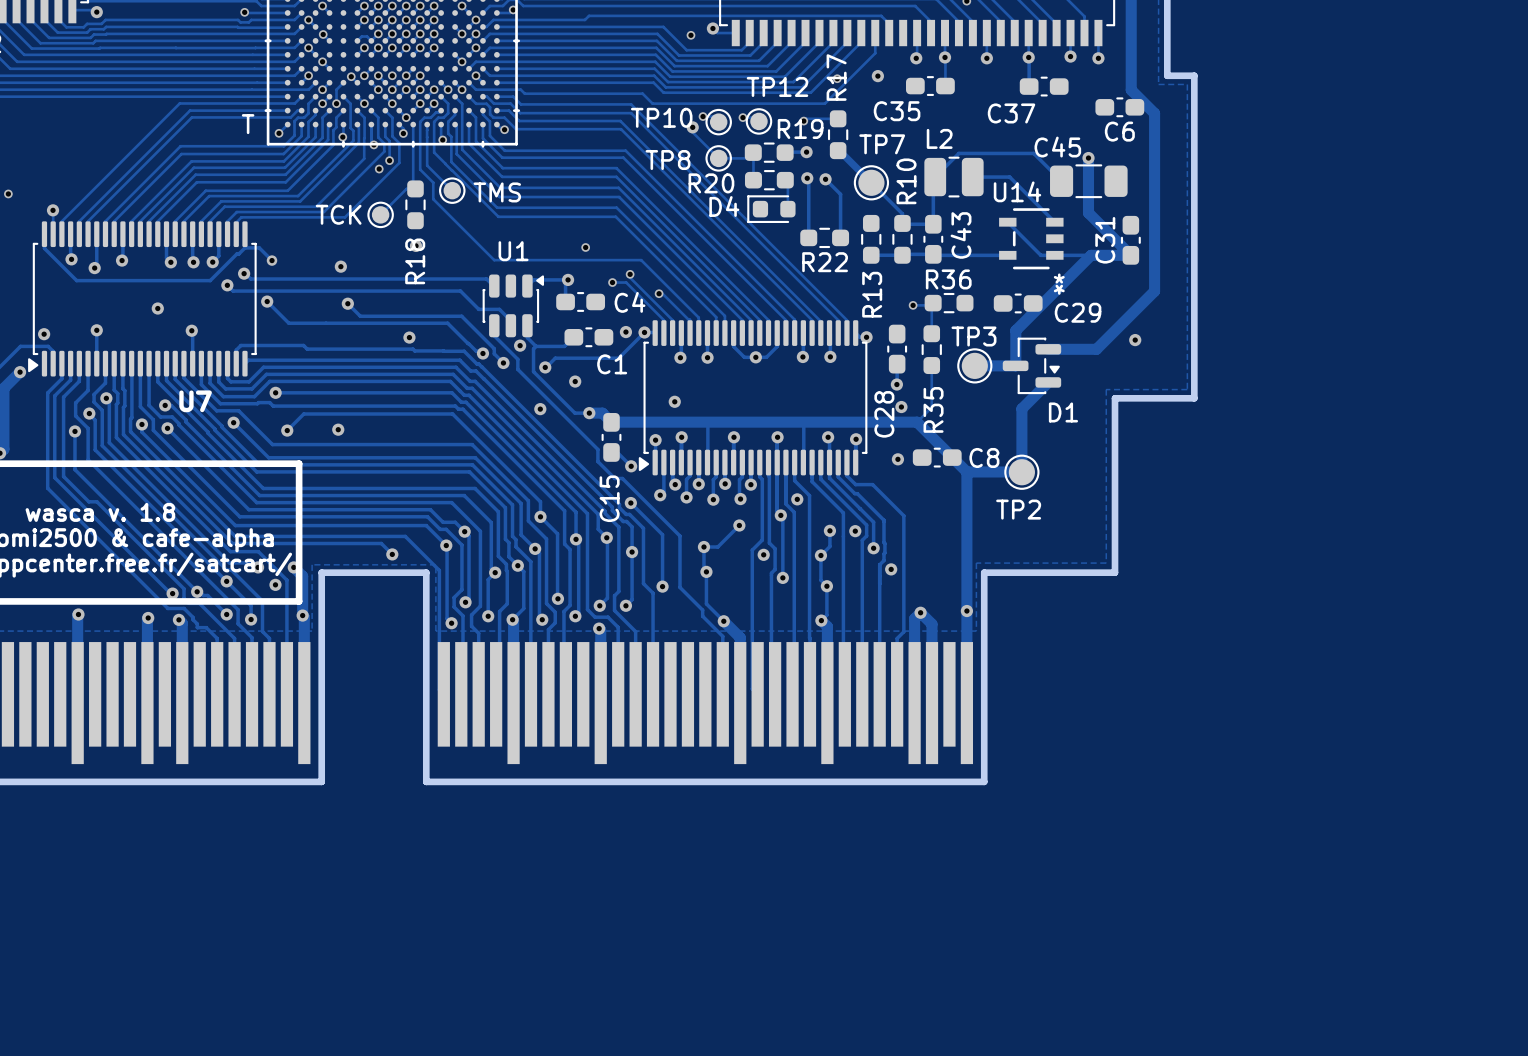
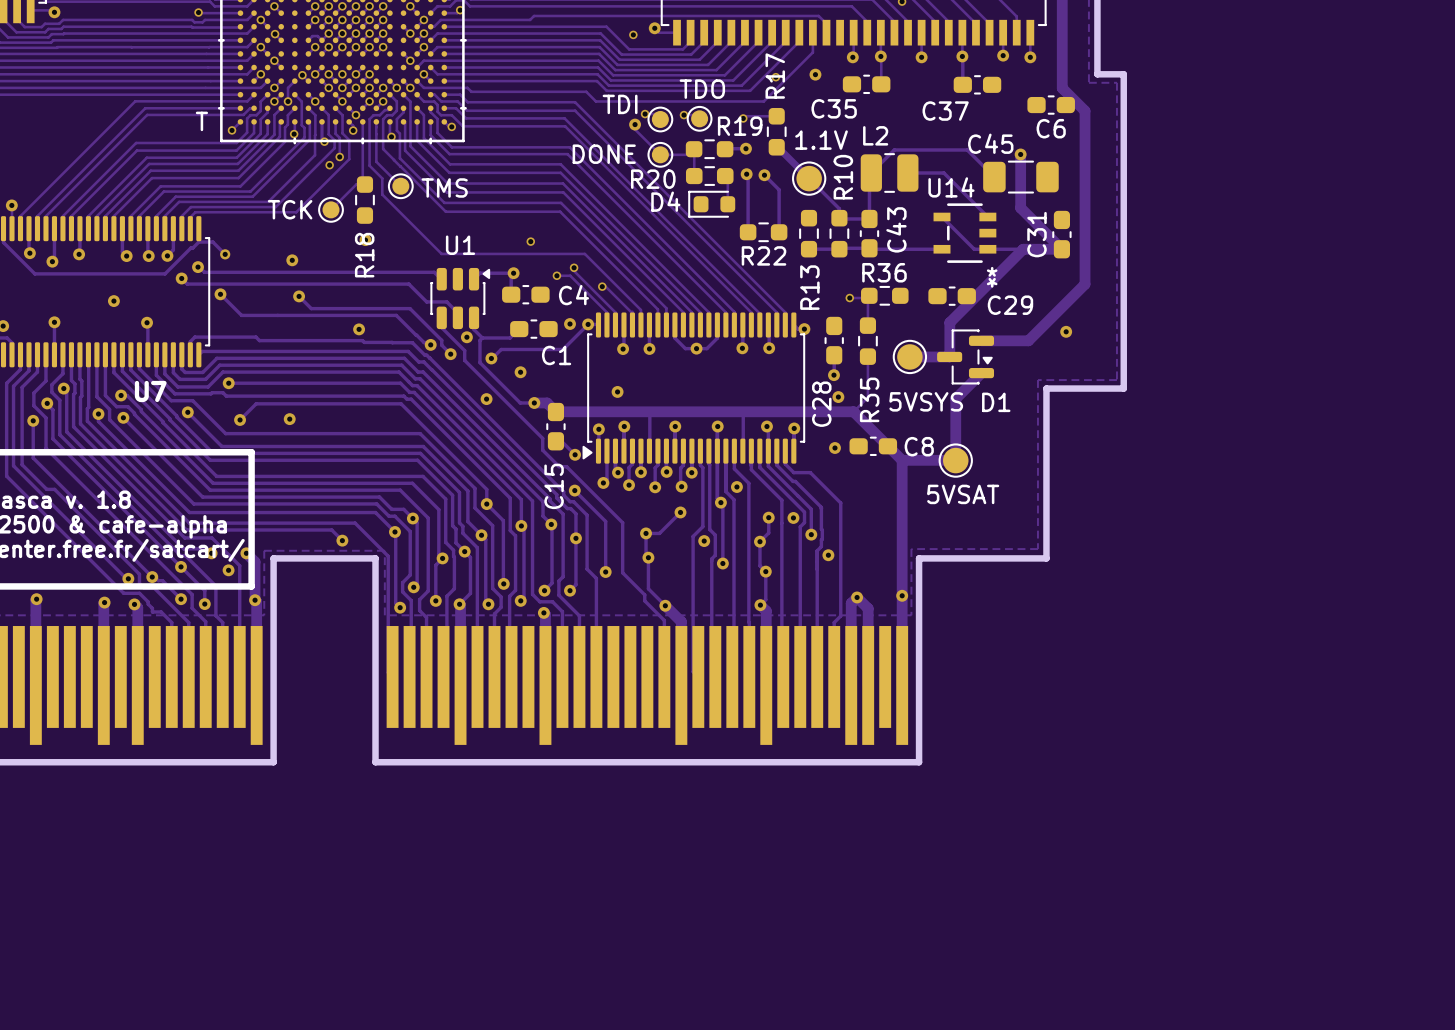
TP12 name: TP12 (777, 86) -> none
TP12 value: none -> TDO (702, 89)
TP10 value: none -> TDI (620, 104)
TP10 name: TP10 (661, 117) -> none
TP7 value: none -> 1.1V (821, 140)
TP7 name: TP7 (882, 144) -> none
TP8 text: none -> DONE (604, 154)
TP8 name: TP8 (668, 160) -> none
TP3 name: TP3 (973, 336) -> none
TP3 value: none -> 5VSYS (926, 401)
TP2 value: none -> 5VSAT (963, 494)
TP2 name: TP2 (1018, 509) -> none

